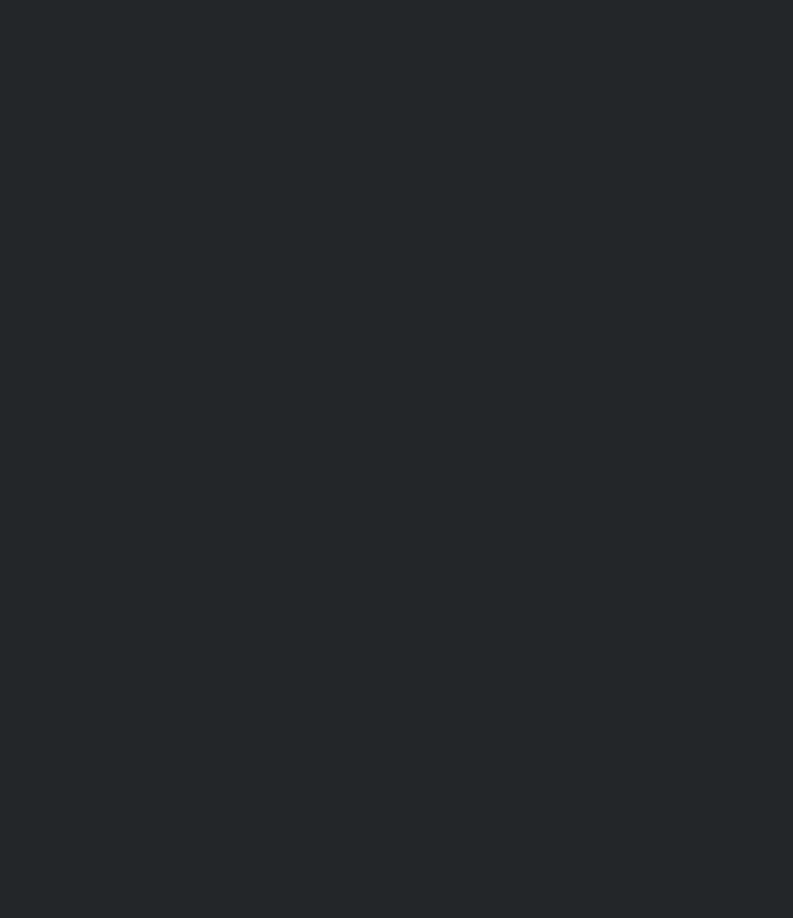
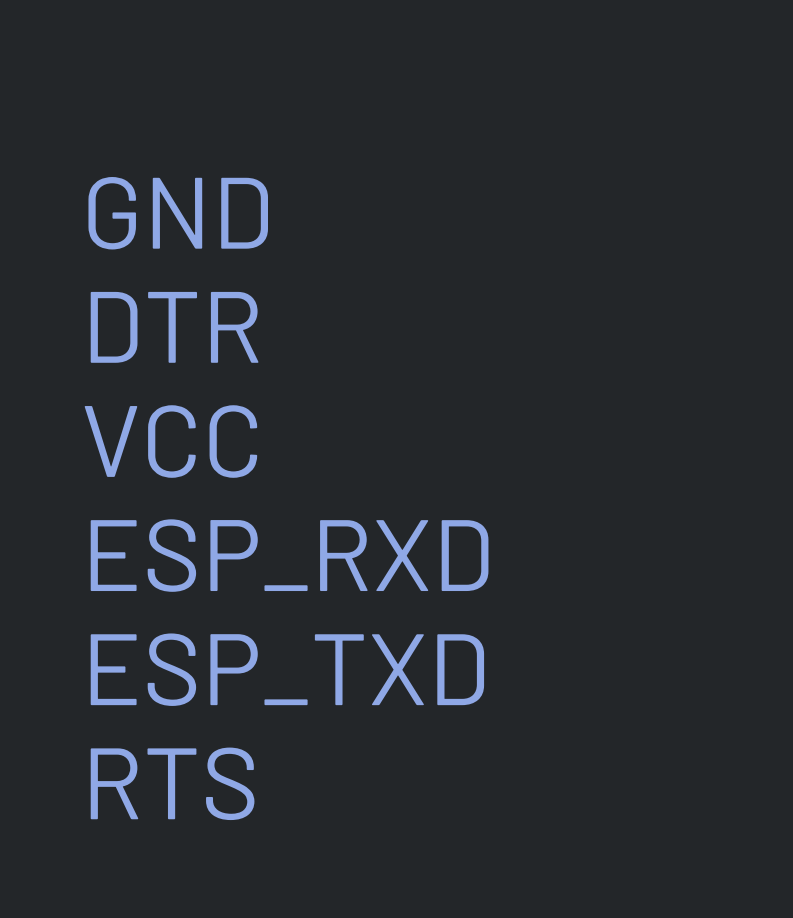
text: none -> GND (178, 213)
text: none -> DTR (174, 327)
text: none -> VCC (170, 441)
text: none -> ESP_RXD (289, 555)
text: none -> ESP_TXD (287, 669)
text: none -> RTS (172, 783)

